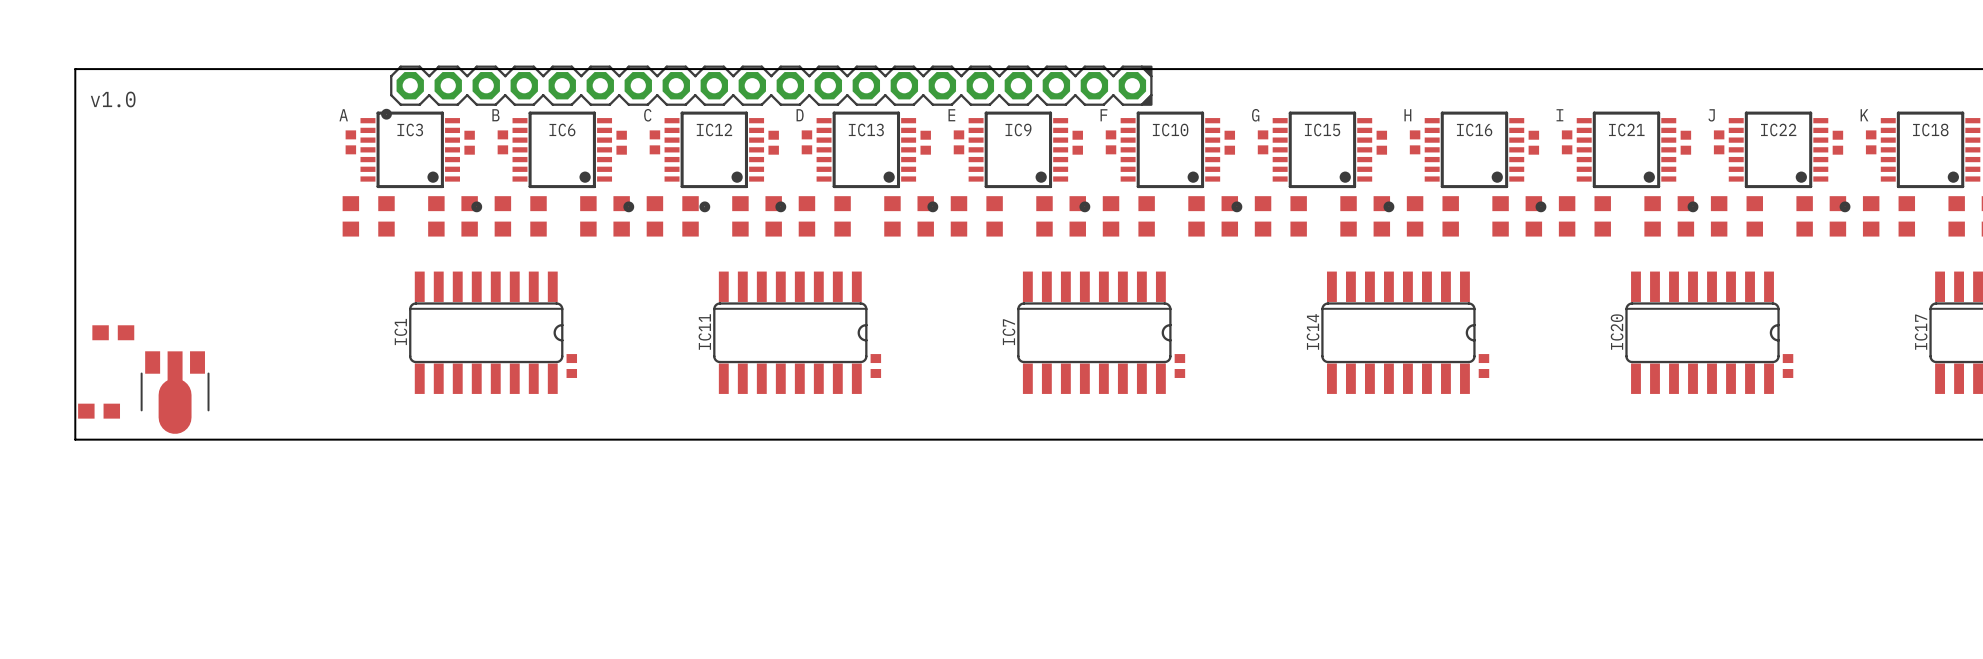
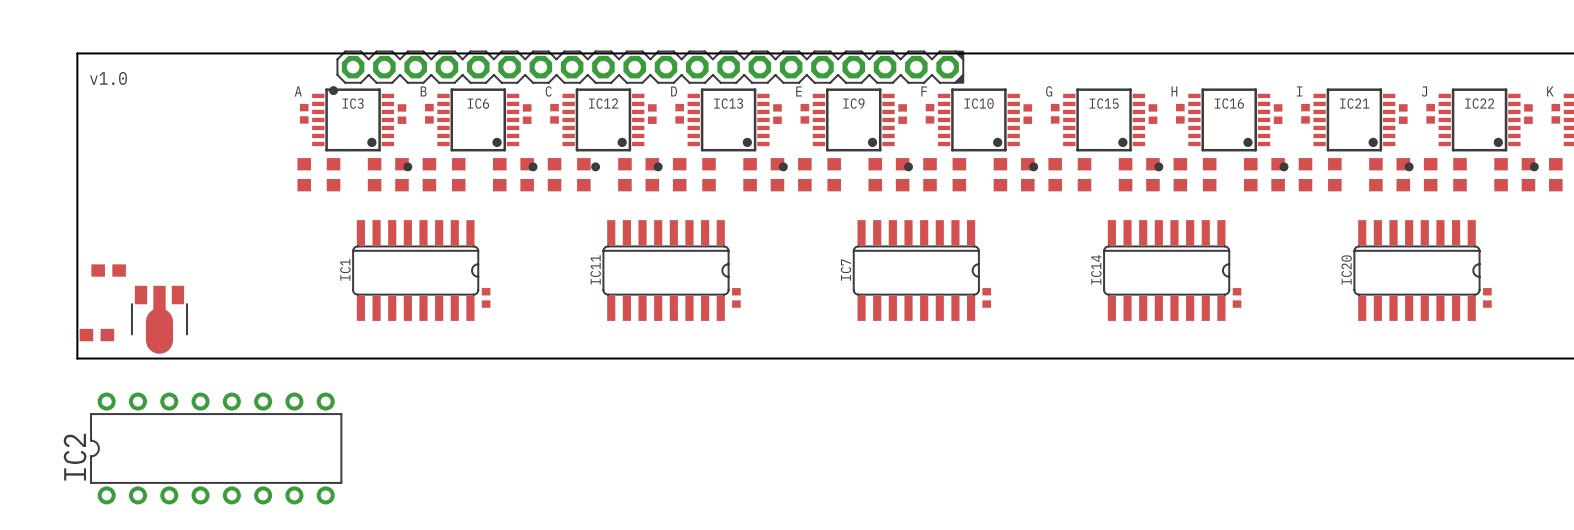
IC2: none -> (216, 448)

